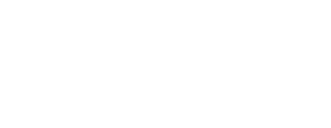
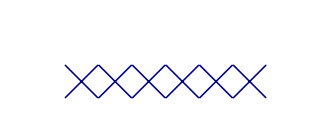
no-connect mark: none -> (81, 81)
no-connect mark: none -> (115, 81)
no-connect mark: none -> (148, 81)
no-connect mark: none -> (182, 81)
no-connect mark: none -> (216, 81)
no-connect mark: none -> (249, 81)

